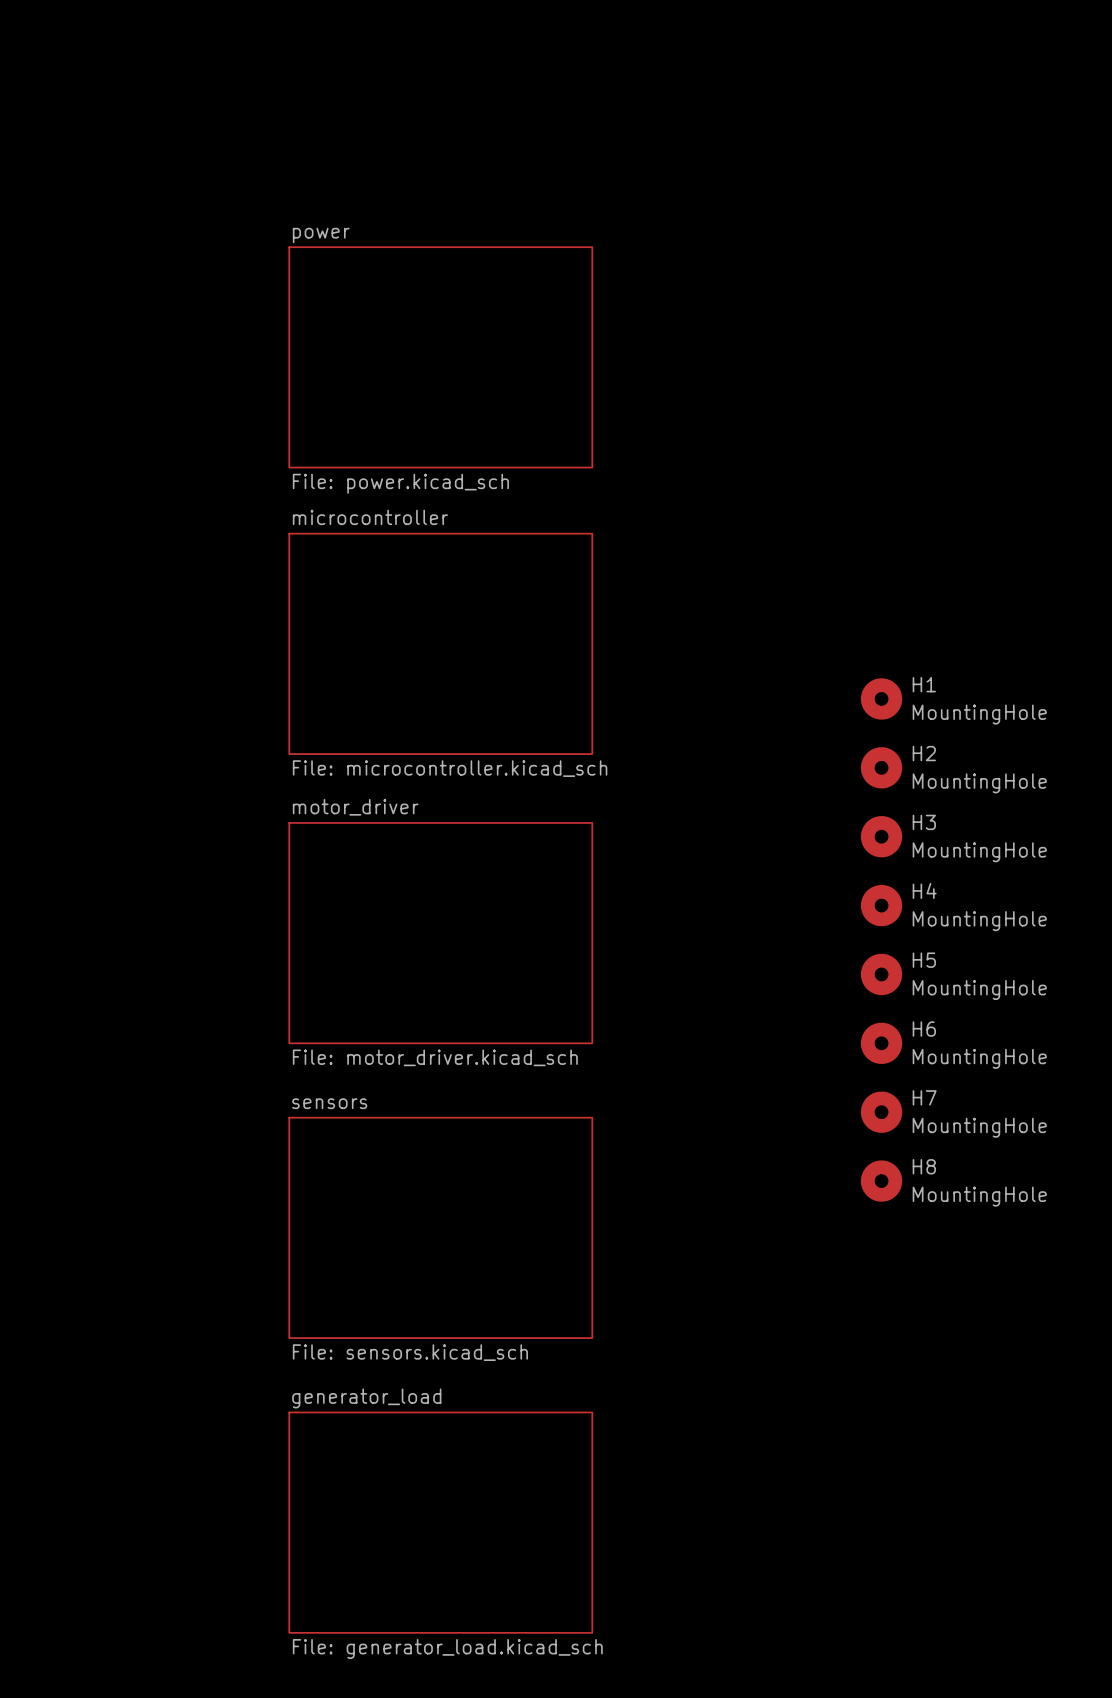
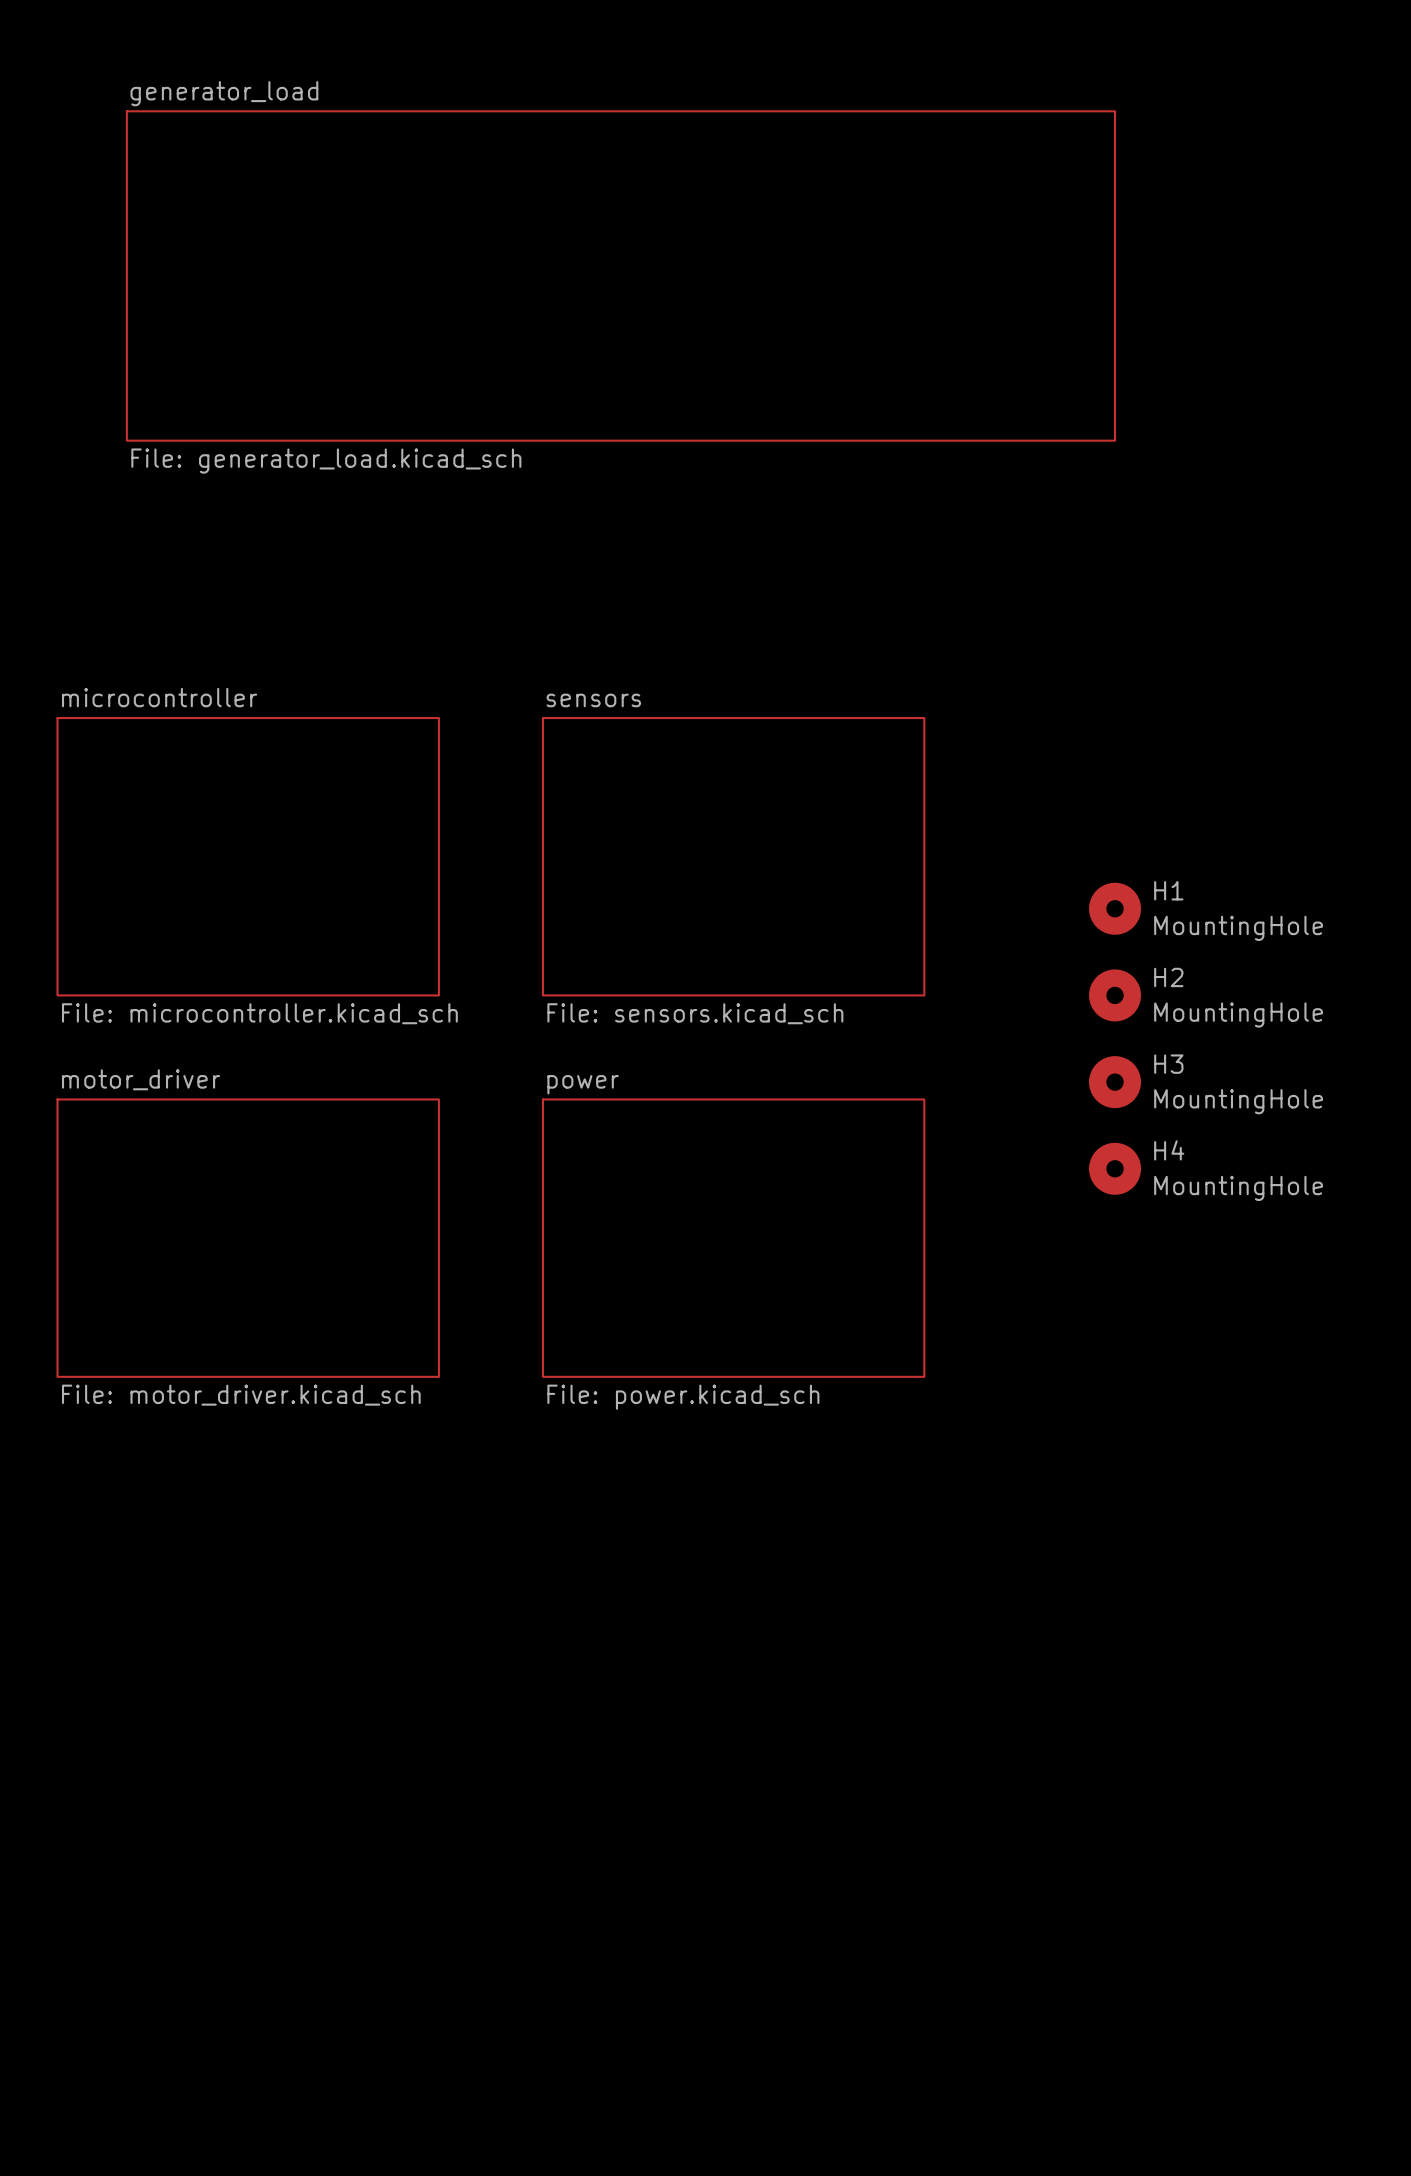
sheet generator_load: none -> File: generator_load.kicad_sch (620, 275)
sheet power: File: power.kicad_sch (440, 357) -> none
sheet microcontroller position: (440, 643) -> (248, 856)
sheet sensors: none -> File: sensors.kicad_sch (733, 856)
sheet motor_driver position: (440, 933) -> (248, 1238)
sheet power: none -> File: power.kicad_sch (733, 1238)
H5: MountingHole (881, 974) -> none
H6: MountingHole (881, 1043) -> none
H7: MountingHole (881, 1112) -> none
H8: MountingHole (881, 1181) -> none
sheet sensors: File: sensors.kicad_sch (440, 1227) -> none
sheet generator_load: File: generator_load.kicad_sch (440, 1522) -> none

